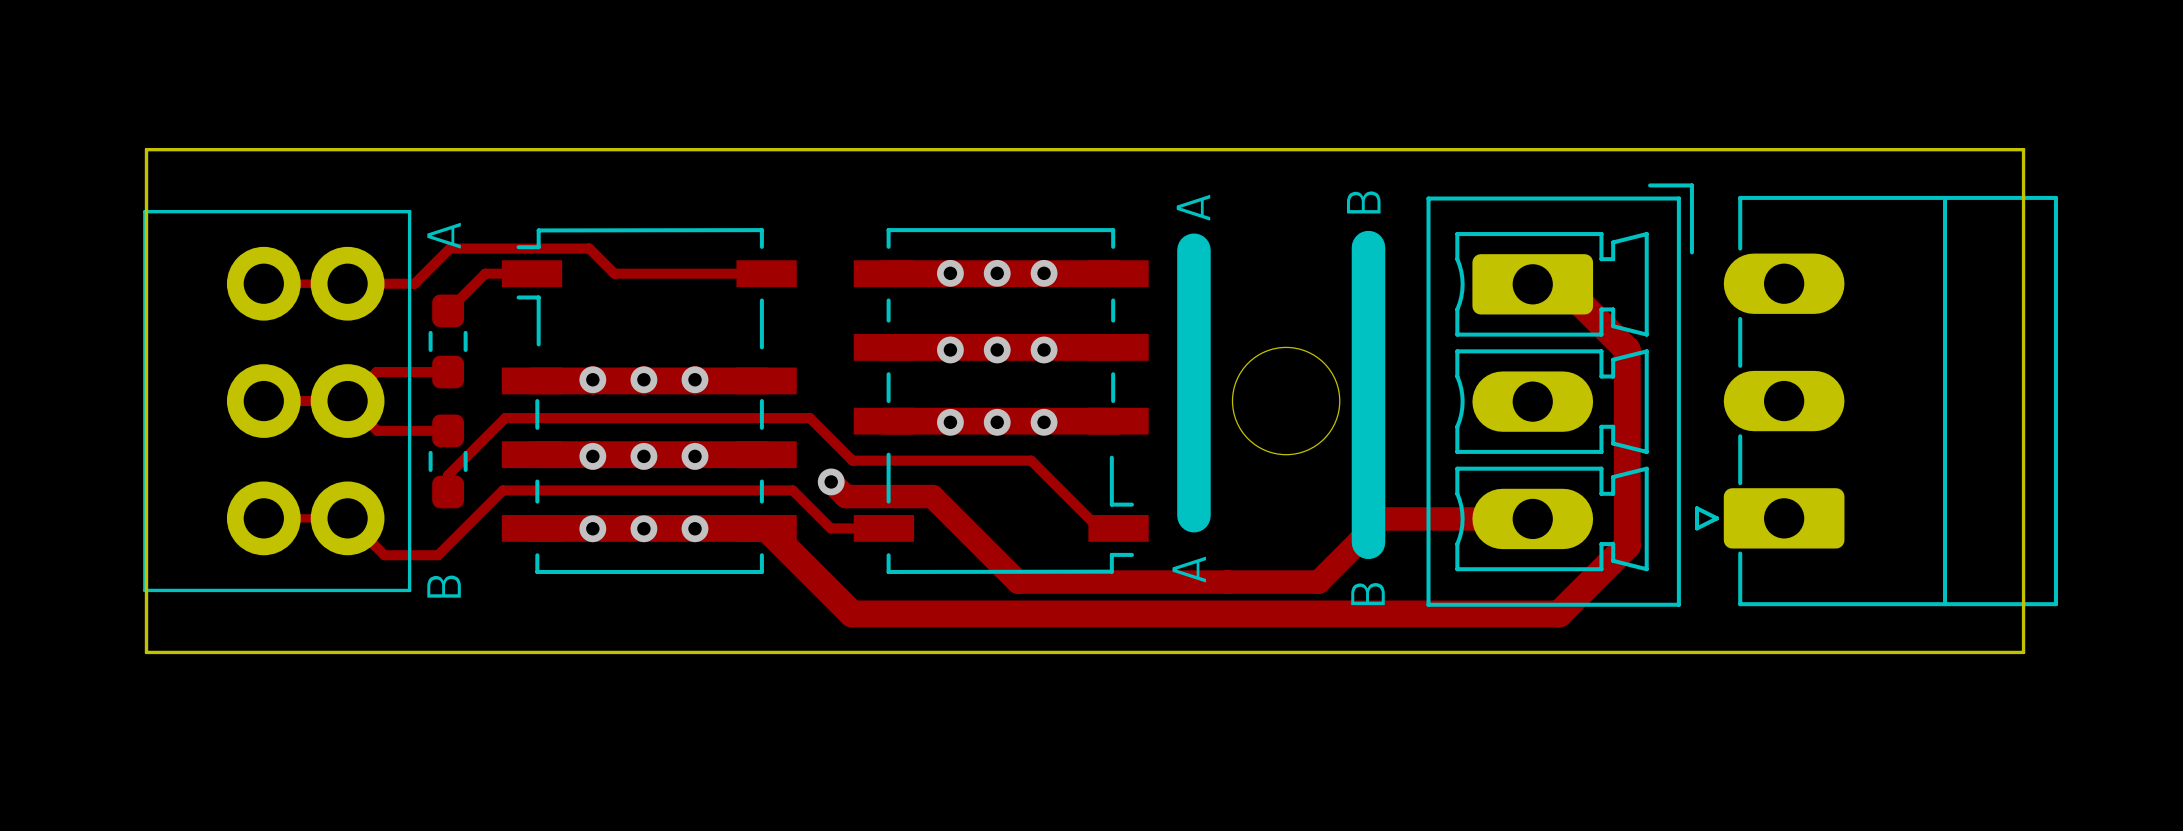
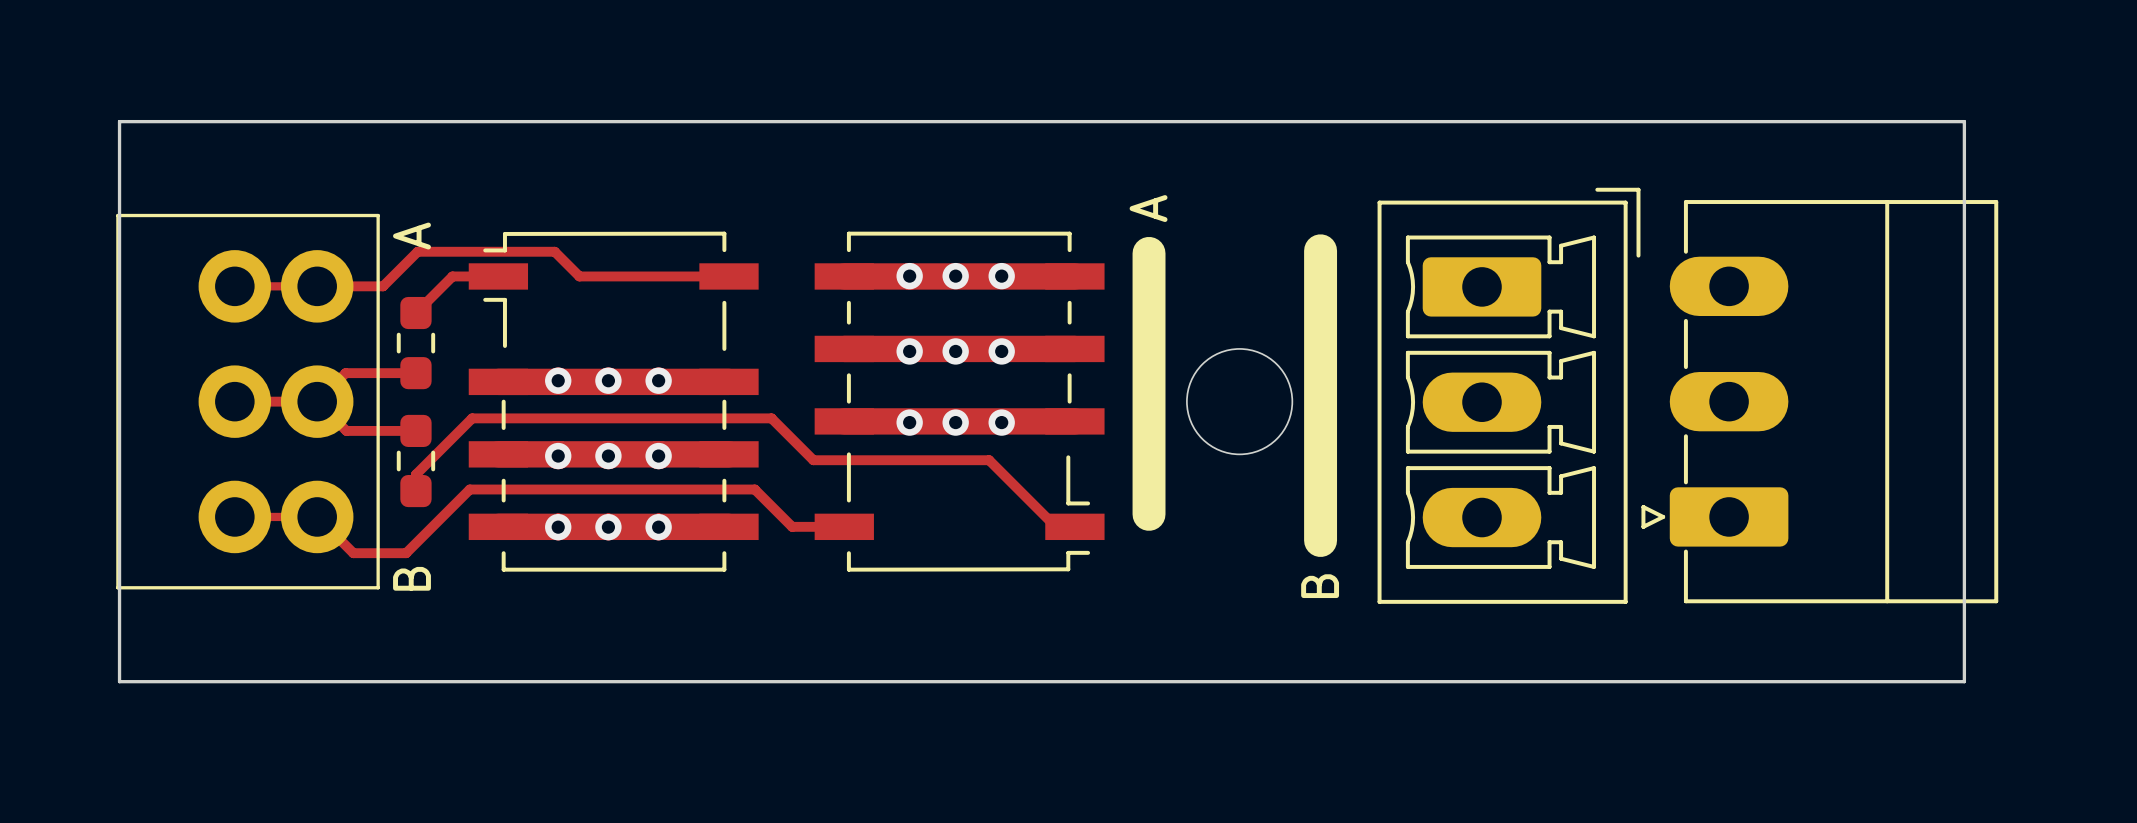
board edge: (146, 149) (2023, 149) -> (119, 154) (119, 121) (1964, 121) (1964, 154)
text: B (1363, 202) -> none
track: (1532, 284) (1561, 284) (1627, 349) (1627, 545) (1559, 613) (852, 613) (766, 528) -> none
track: (831, 481) (845, 496) (932, 496) (1017, 582) (1318, 582) (1381, 518) (1532, 518) -> none
via: (831, 481) -> none
text: A (1189, 569) -> none
board edge: (146, 652) (2023, 652) -> (119, 648) (119, 681) (1964, 681) (1964, 648)

